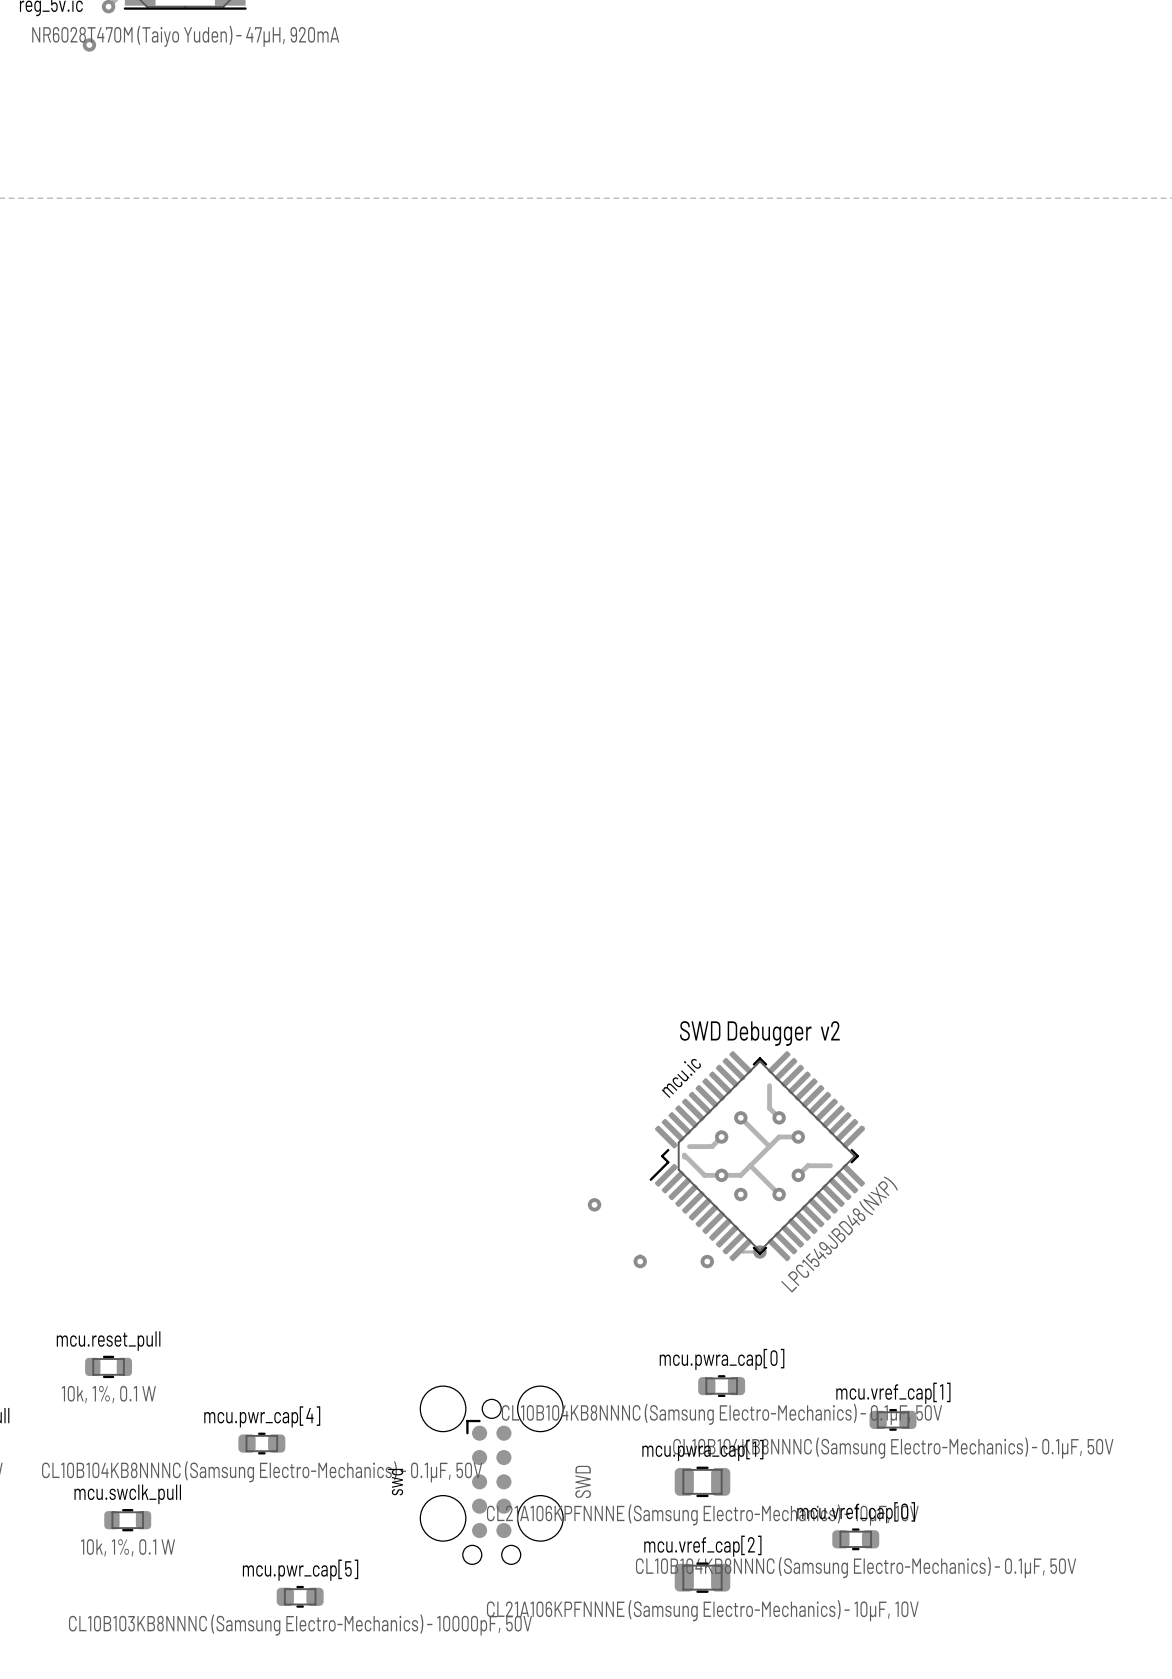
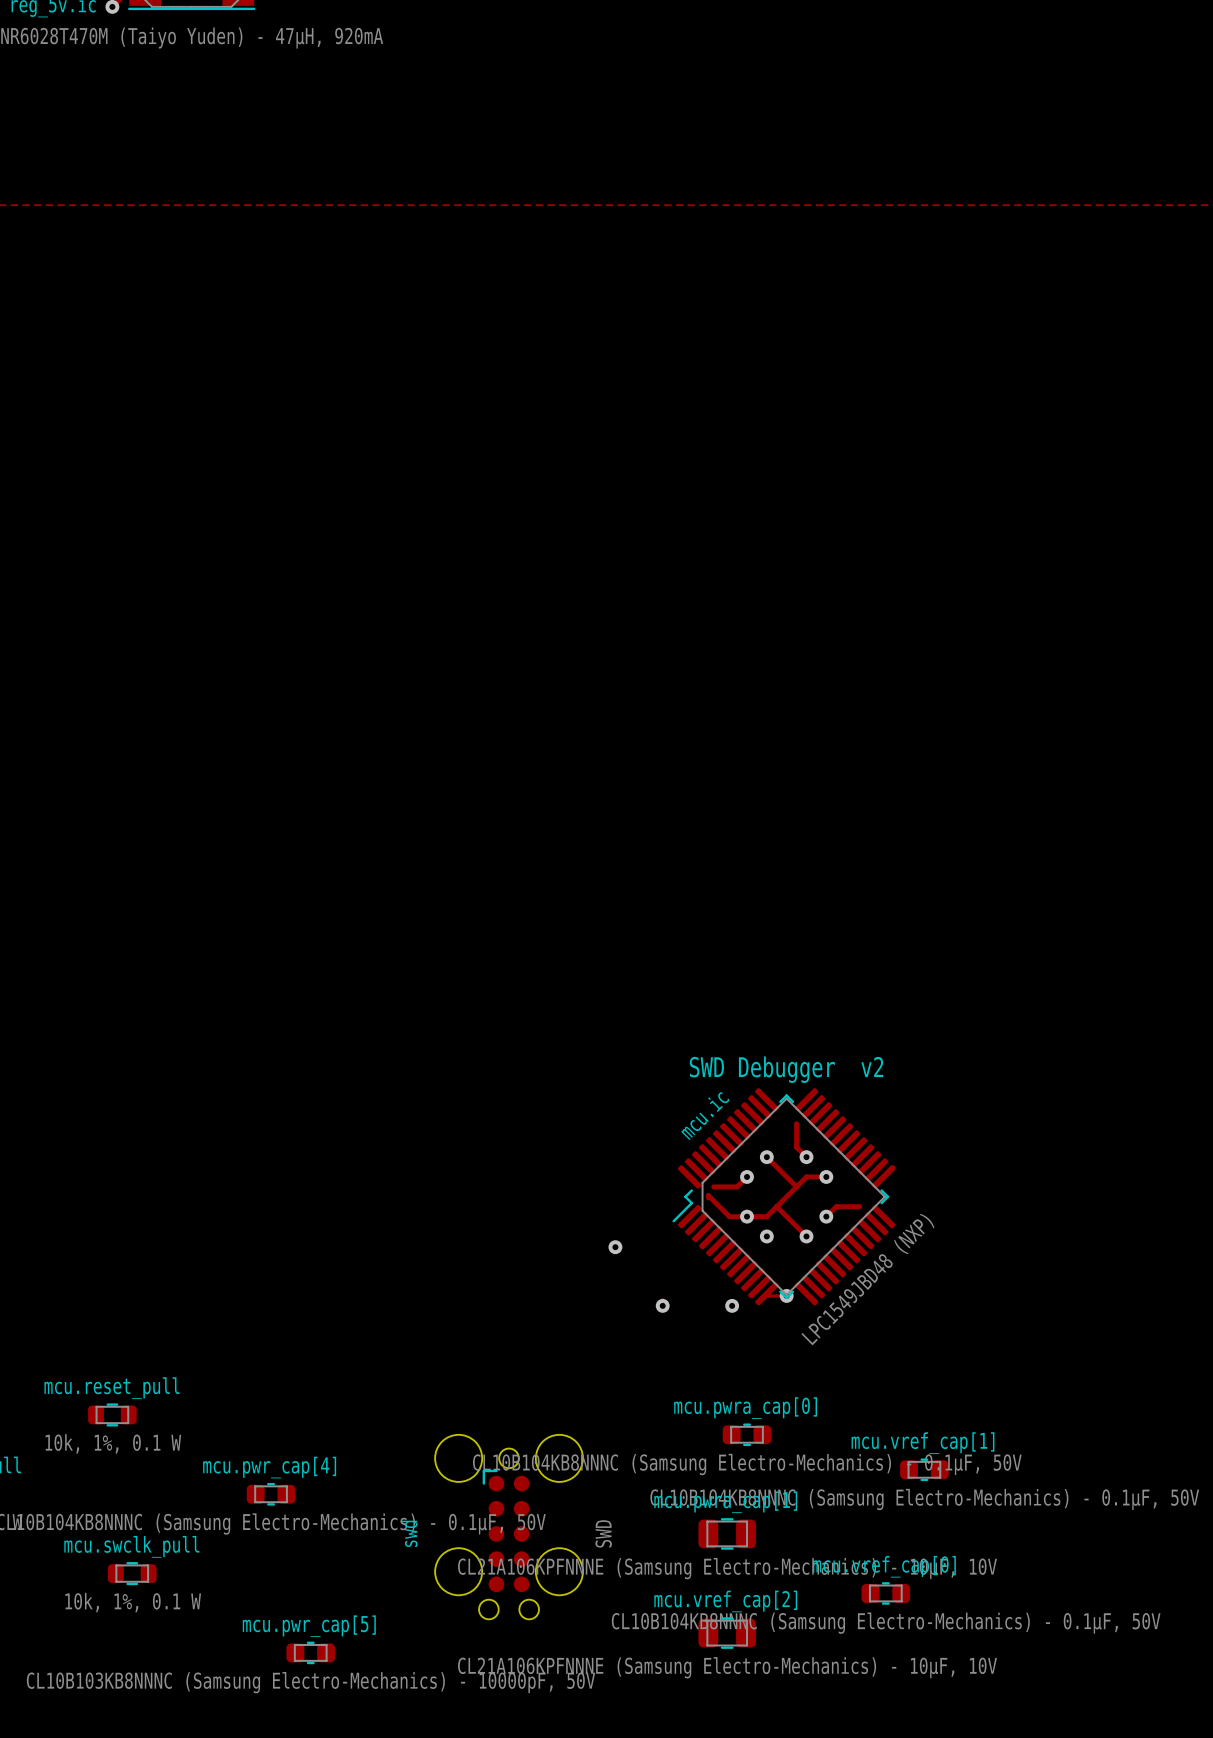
via: (89, 44) -> none

